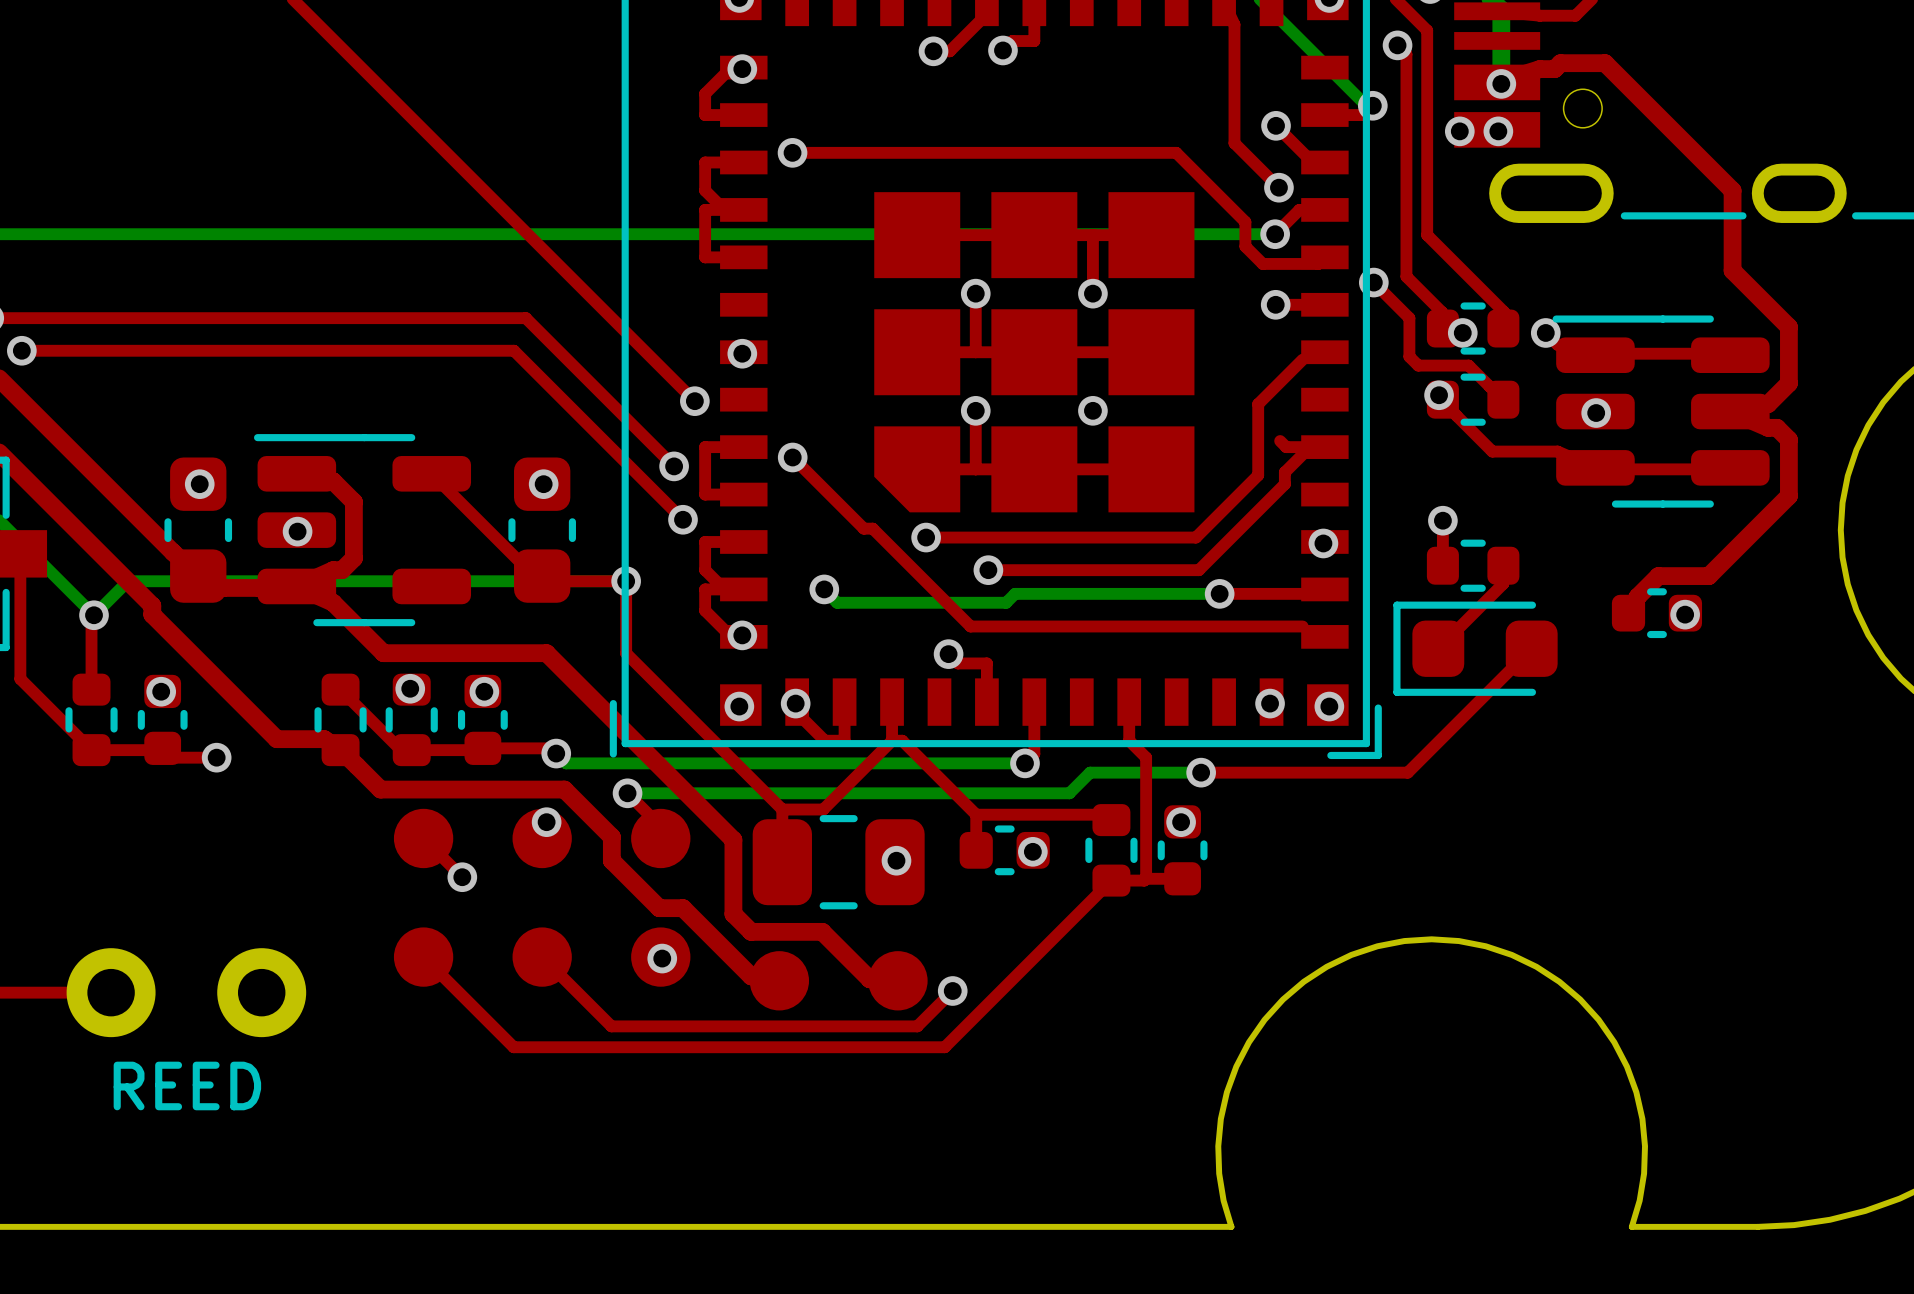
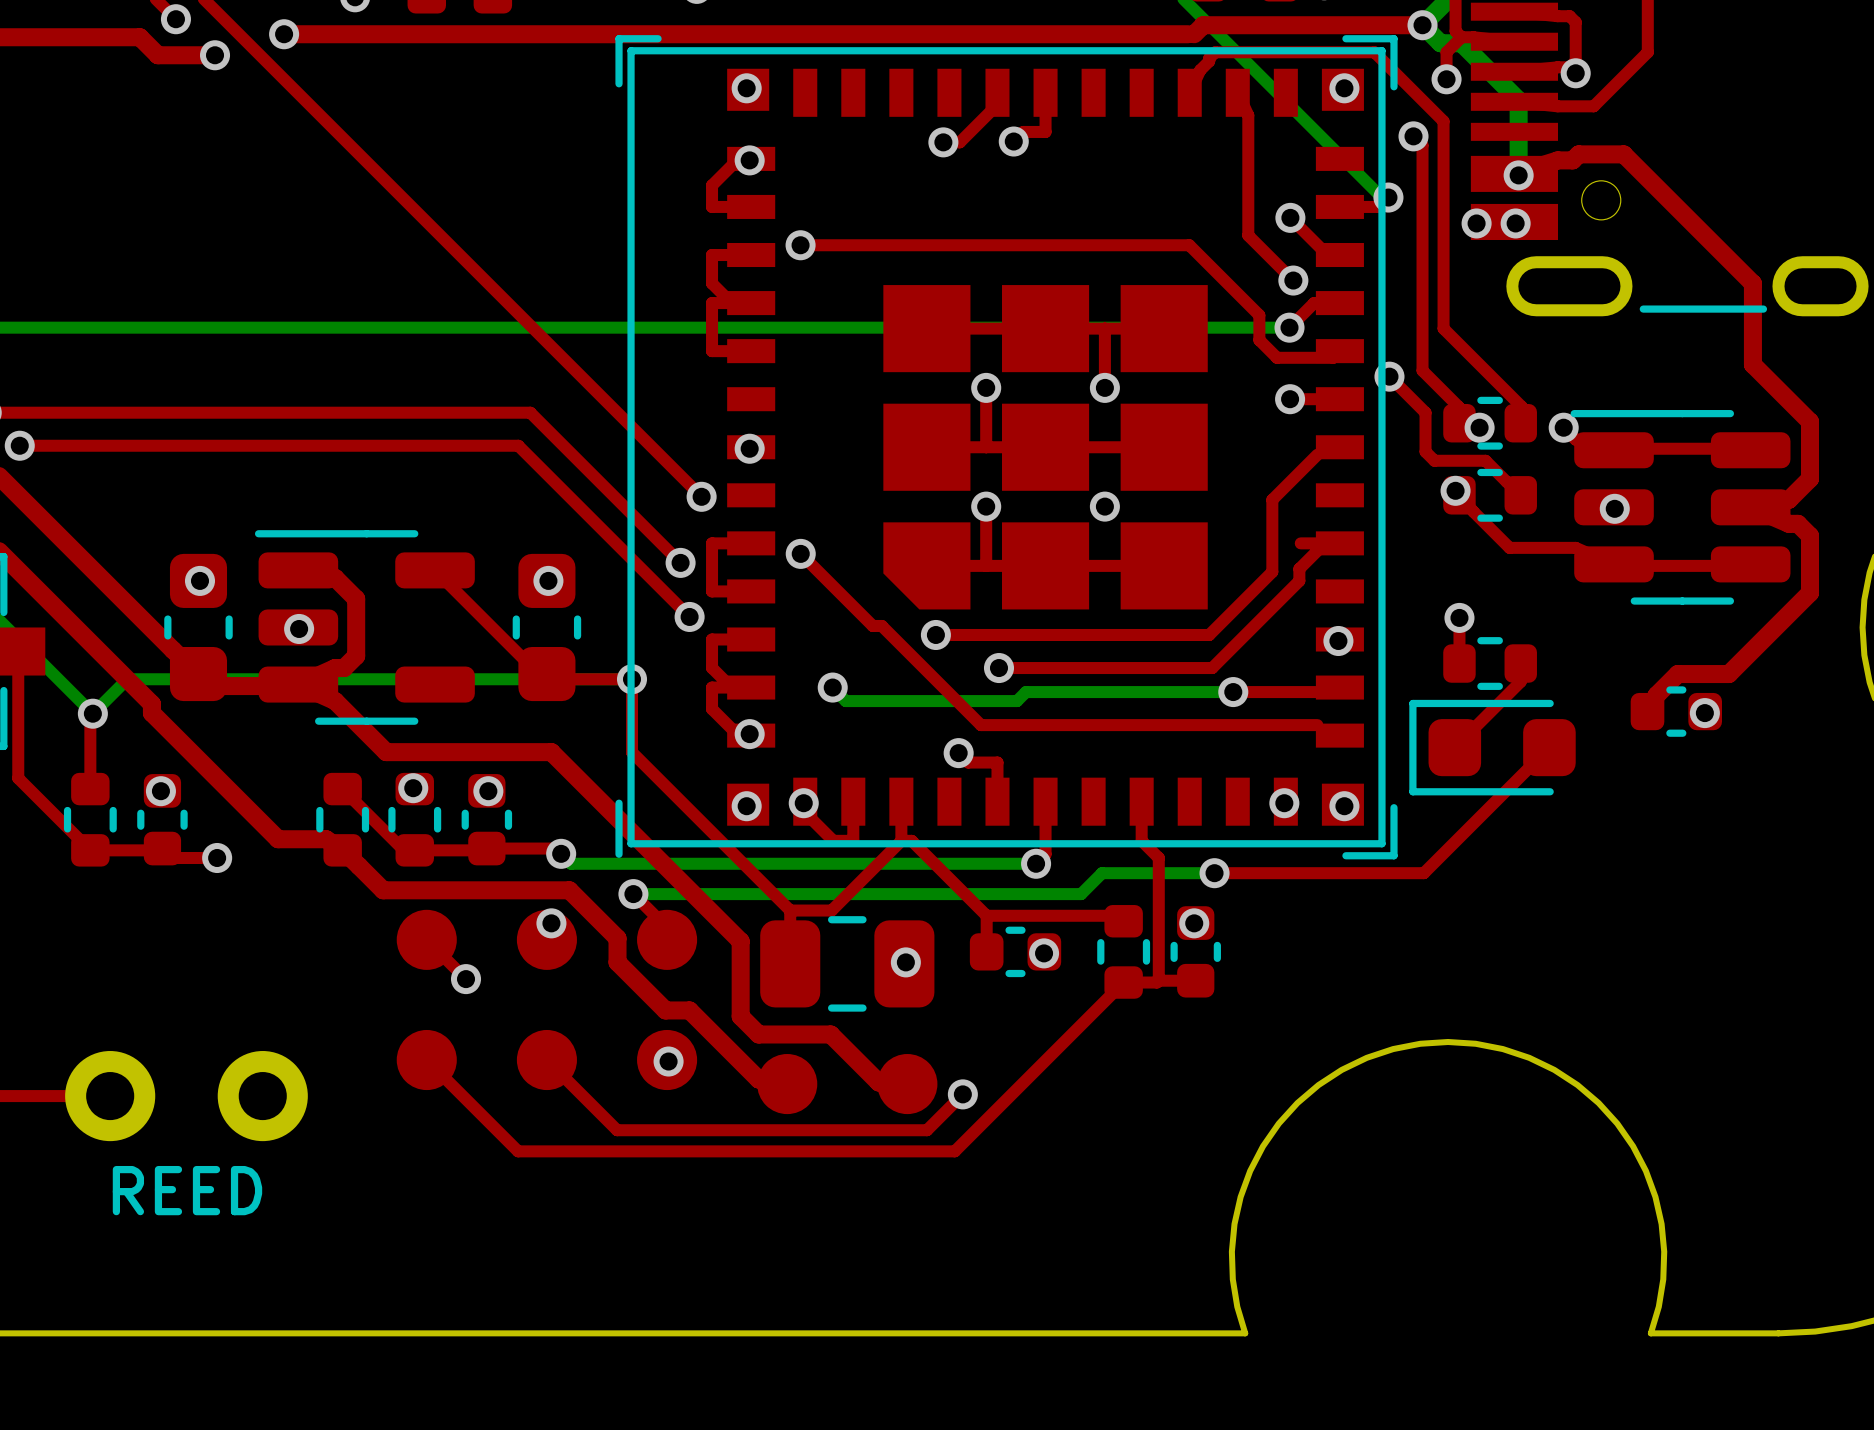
top track: (1280, 441) (1286, 447) -> none

